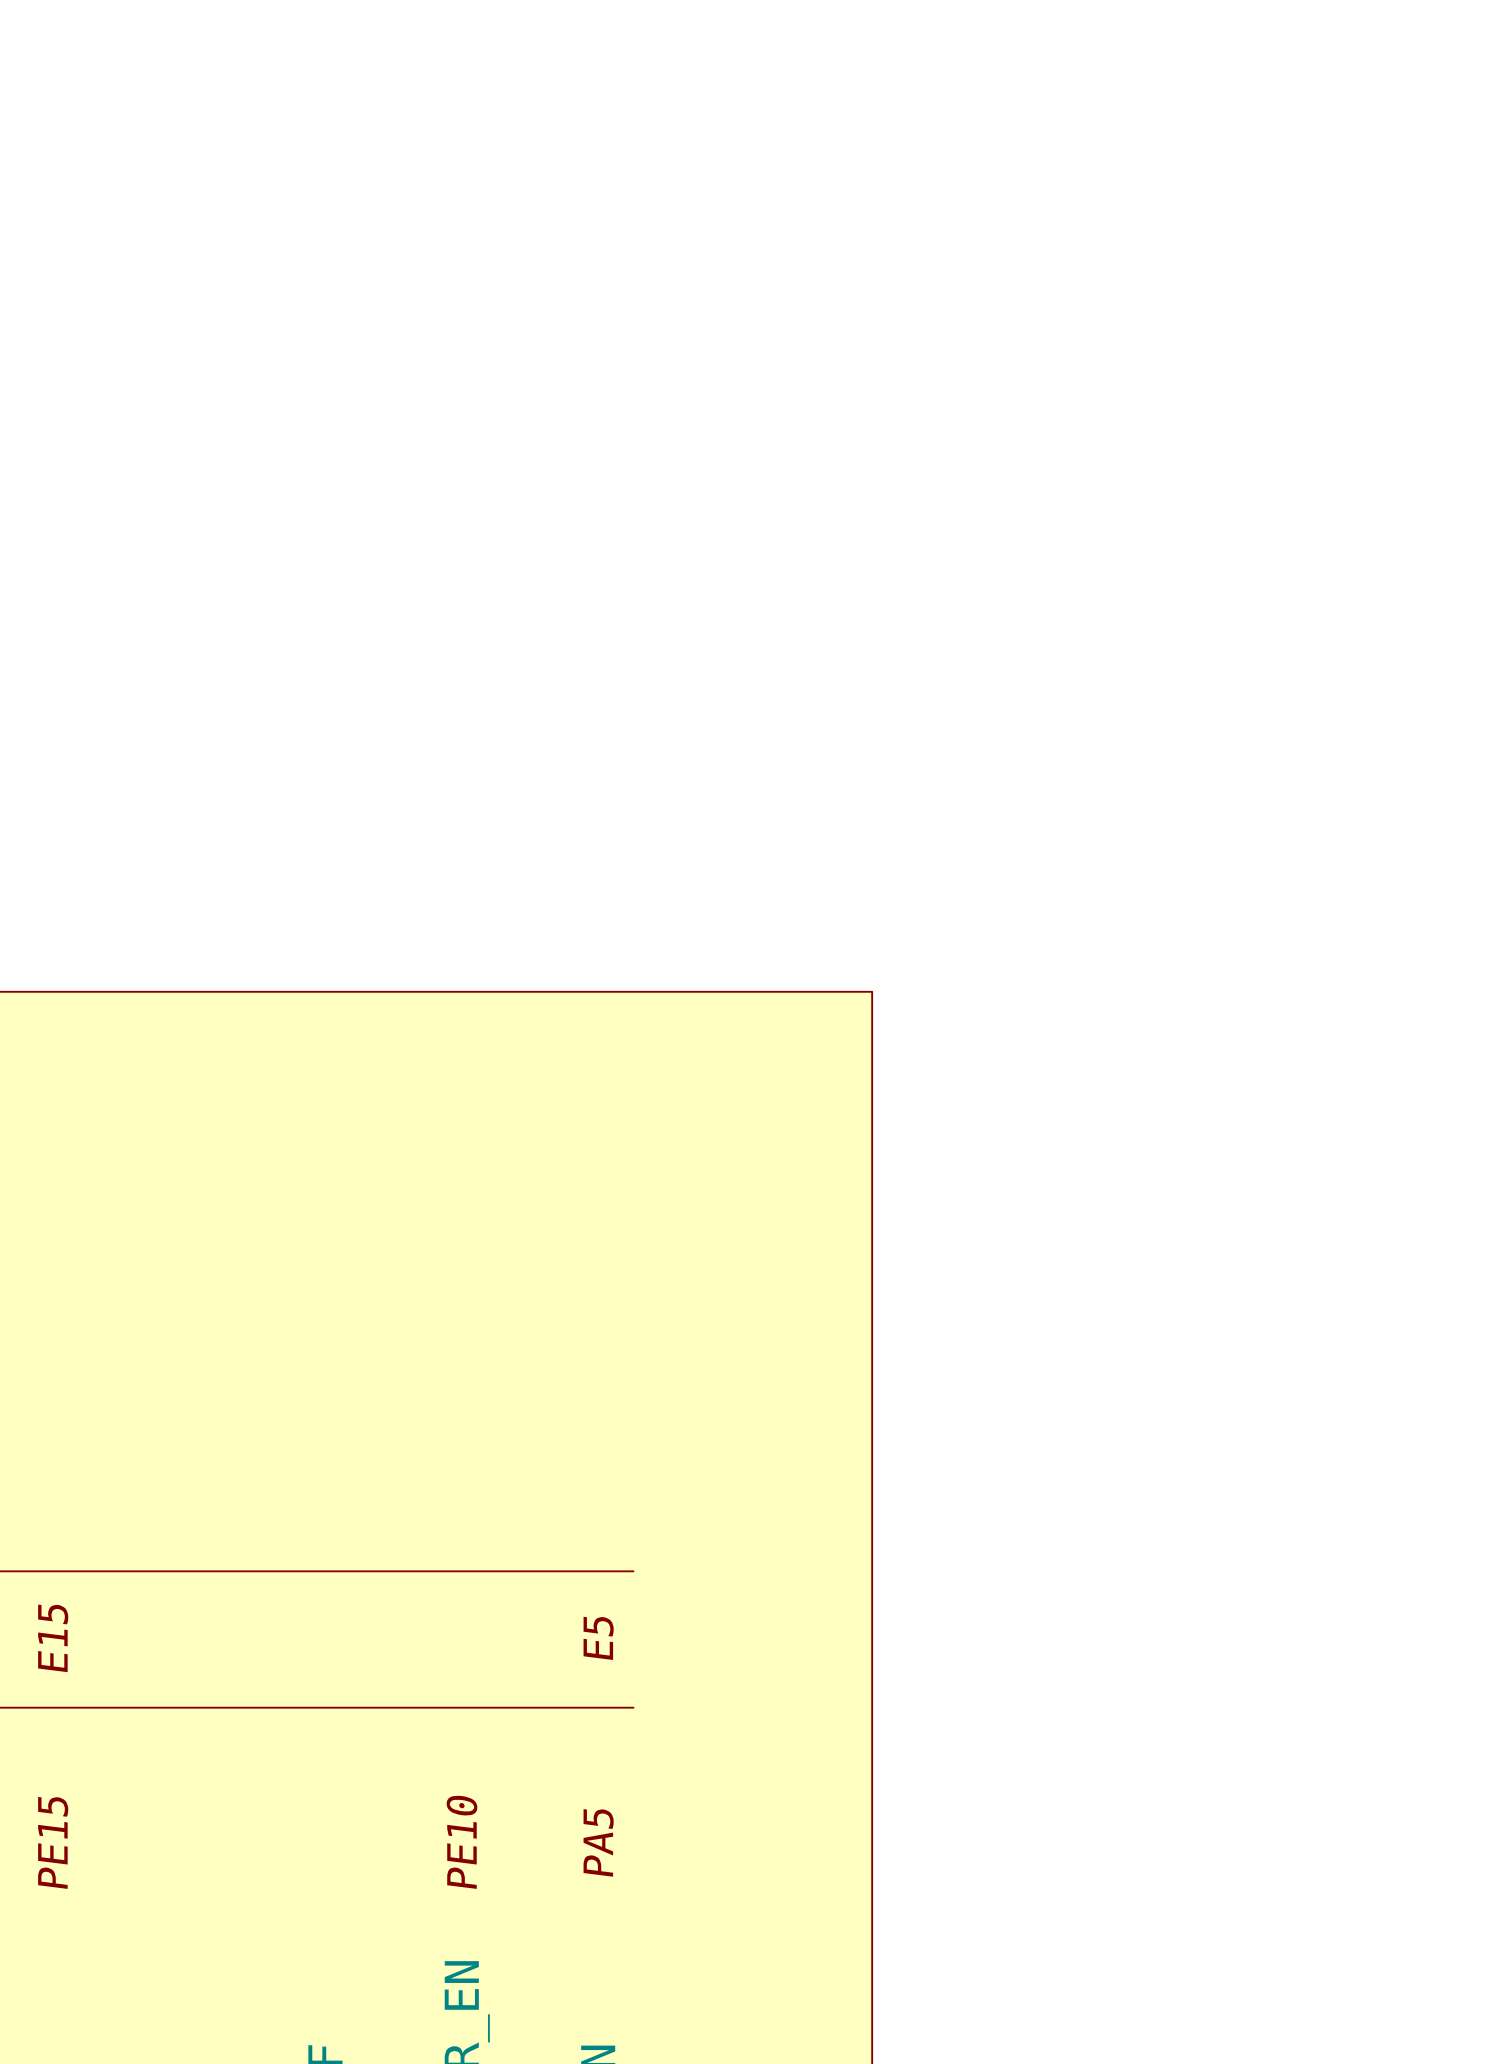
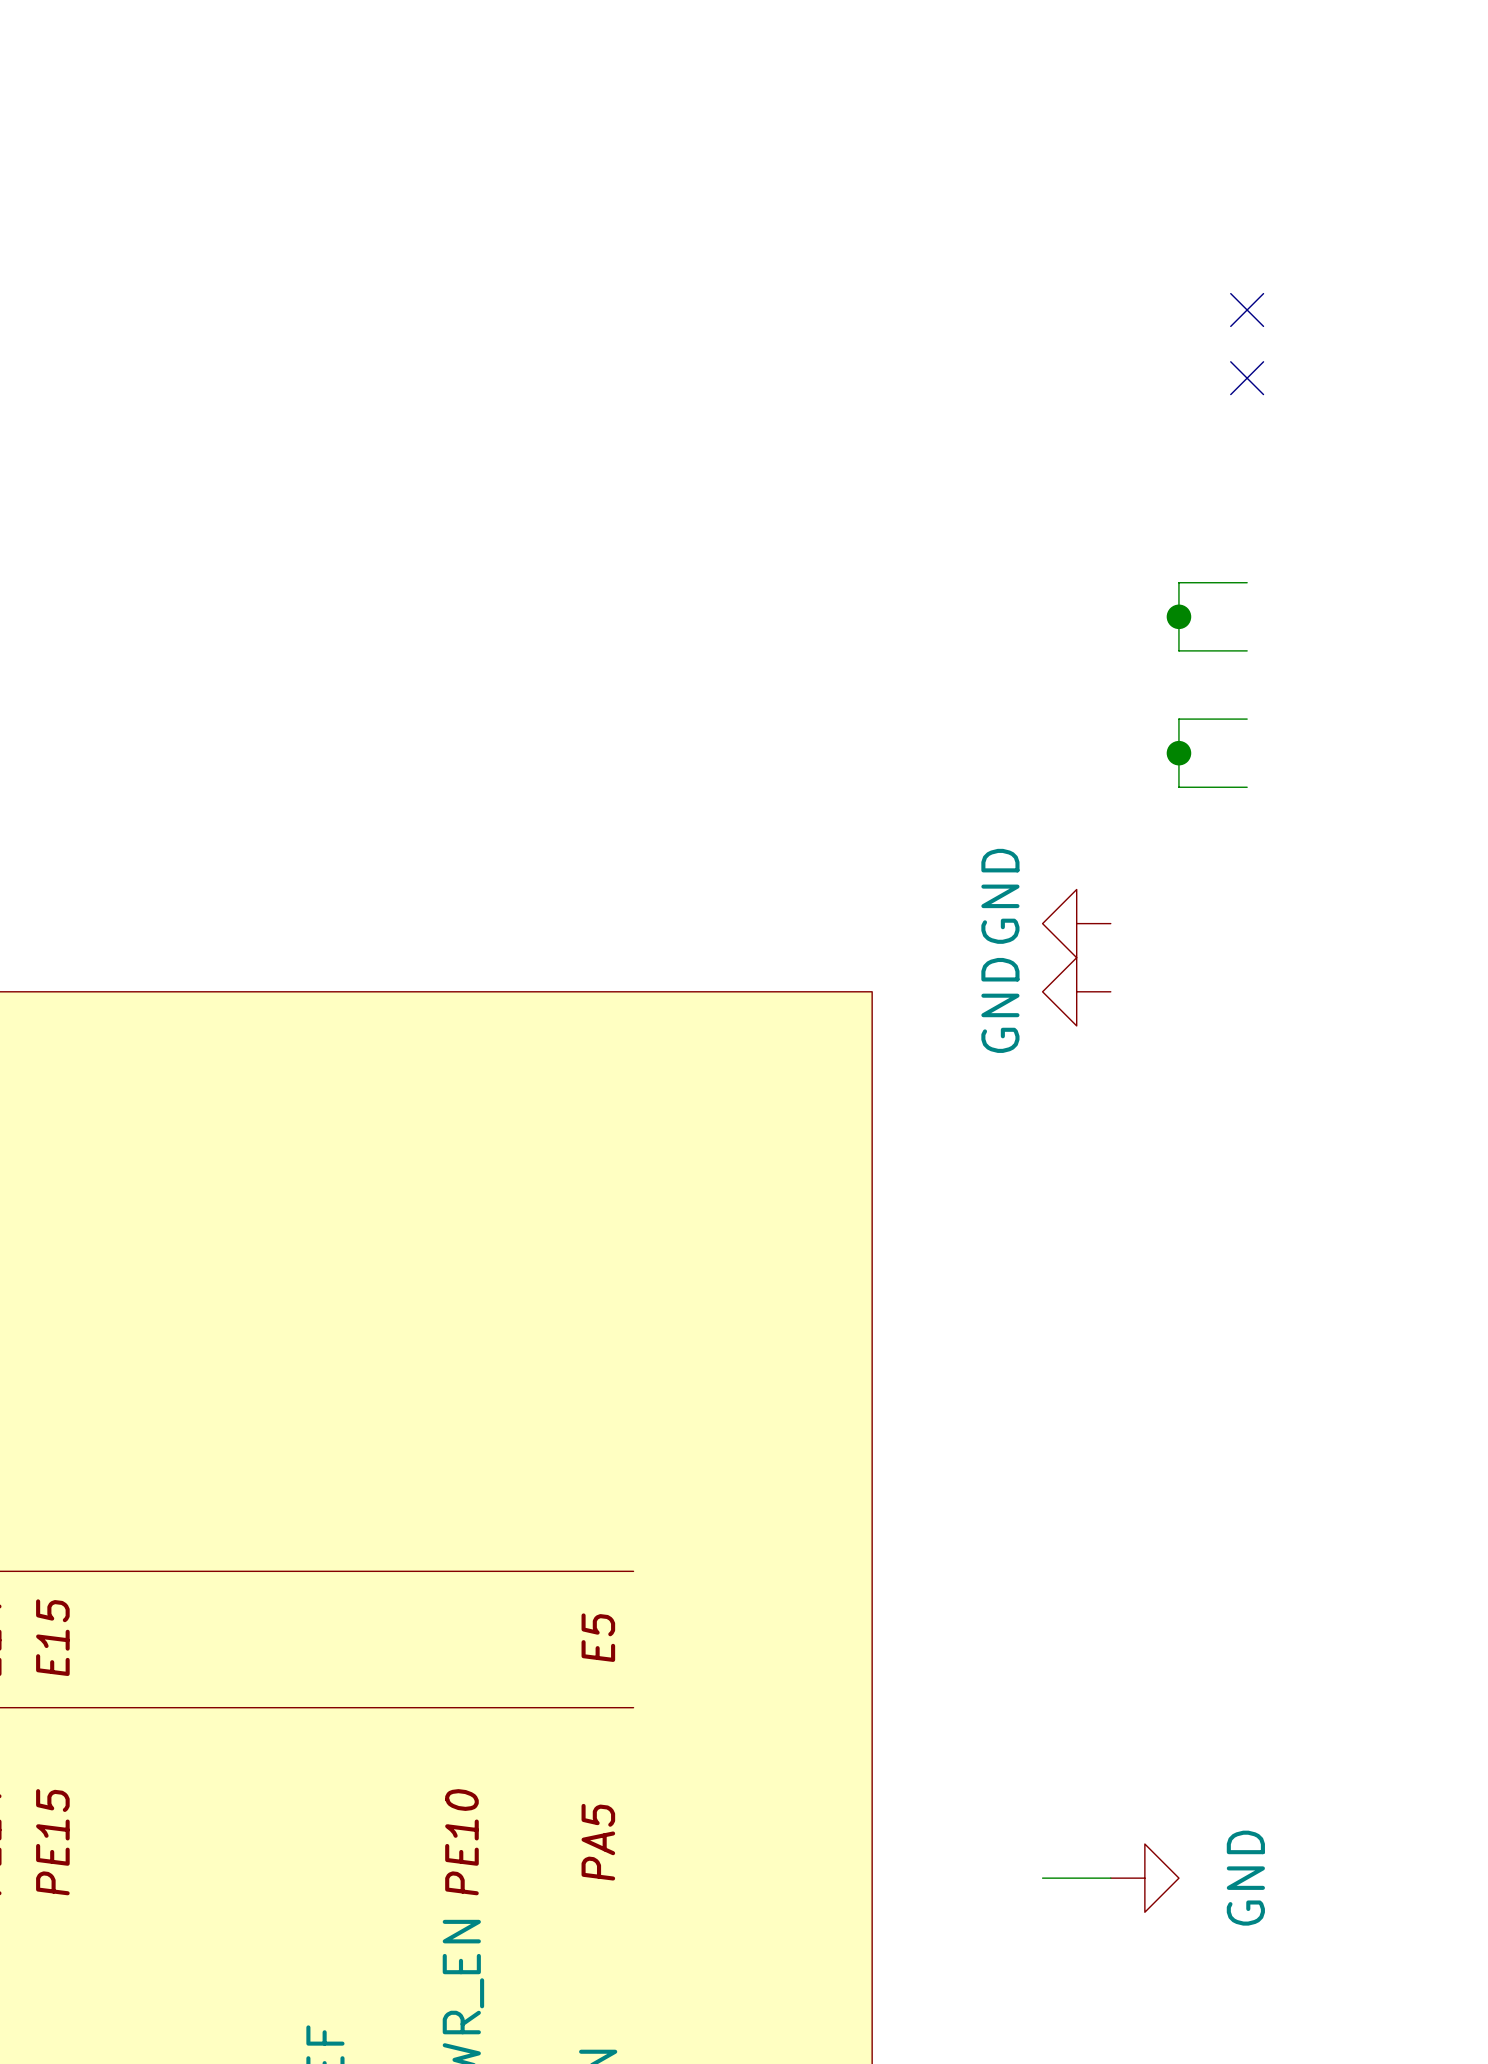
no-connect mark: none -> (1247, 310)
no-connect mark: none -> (1247, 378)
wire: none -> (1247, 582) (1178, 582) (1178, 650) (1247, 650)
junction: none -> (1178, 616)
wire: none -> (1247, 719) (1178, 719) (1178, 787) (1247, 787)
junction: none -> (1178, 753)
power symbol: none -> GND (1076, 923)
power symbol: none -> GND (1076, 991)
wire: none -> (1042, 1878) (1110, 1878)
power symbol: none -> GND (1144, 1878)

